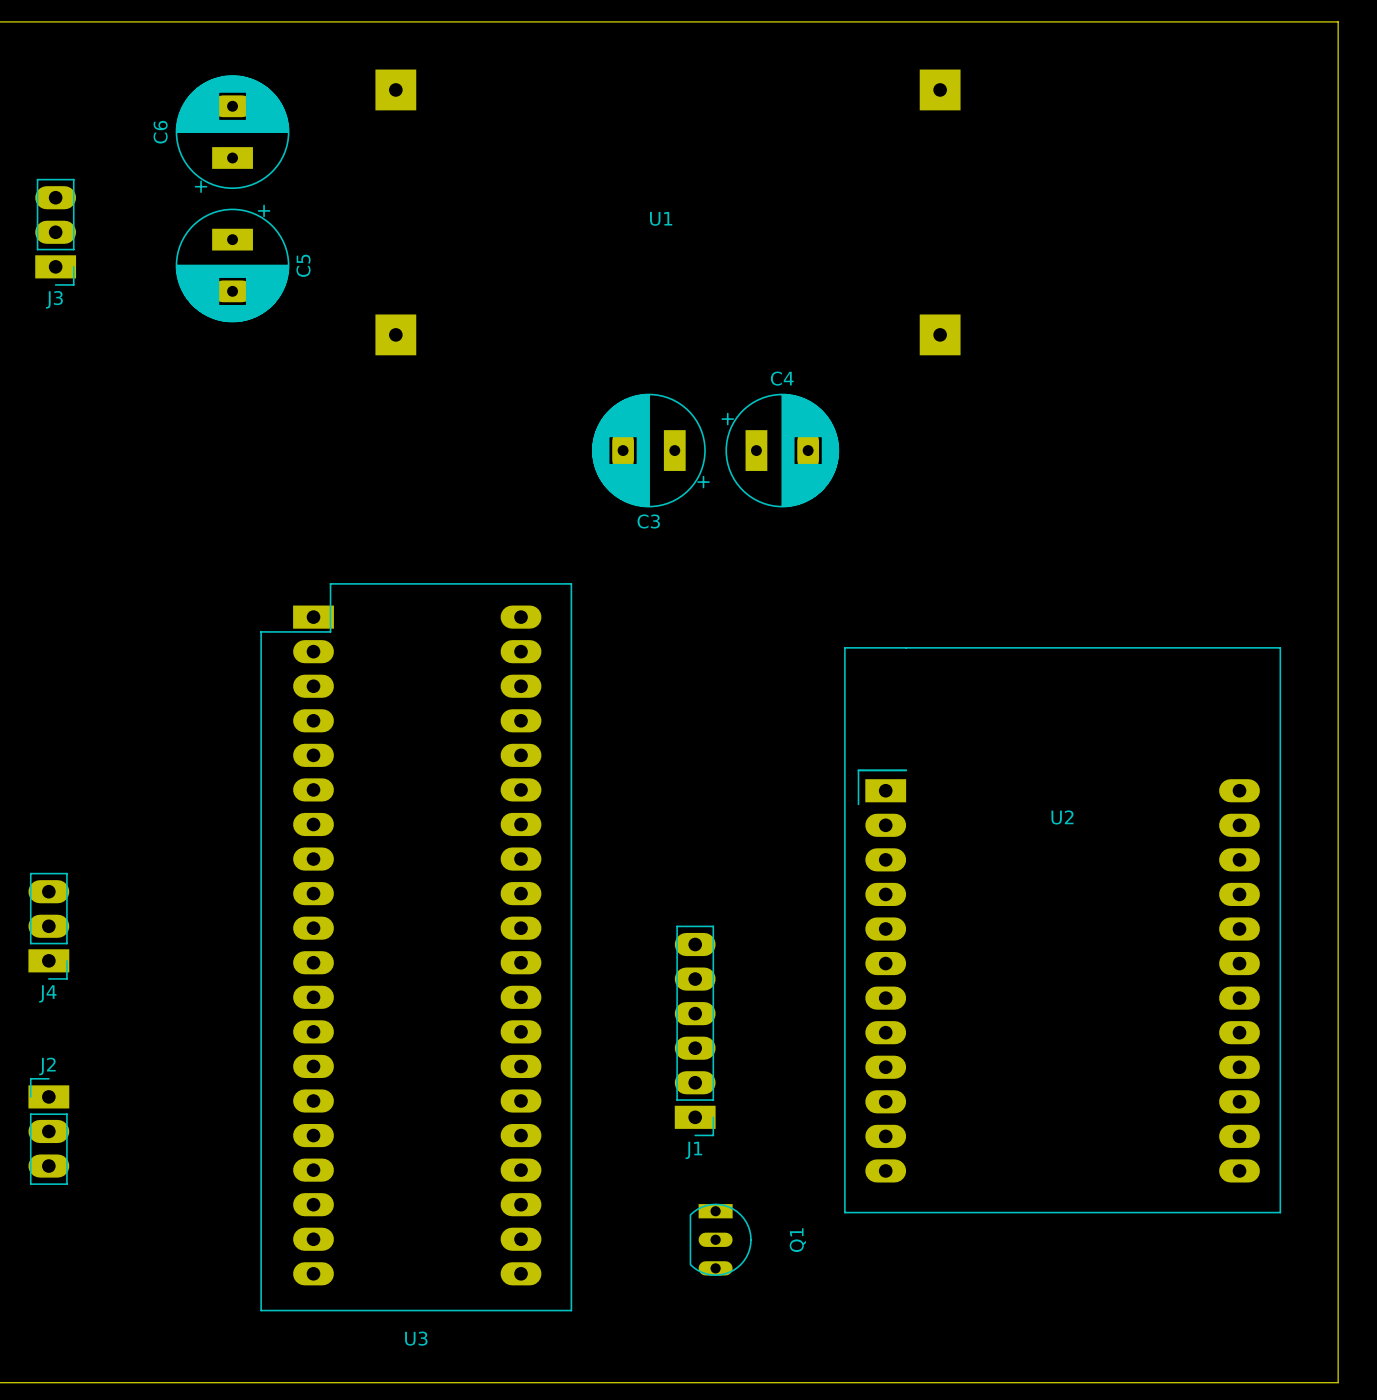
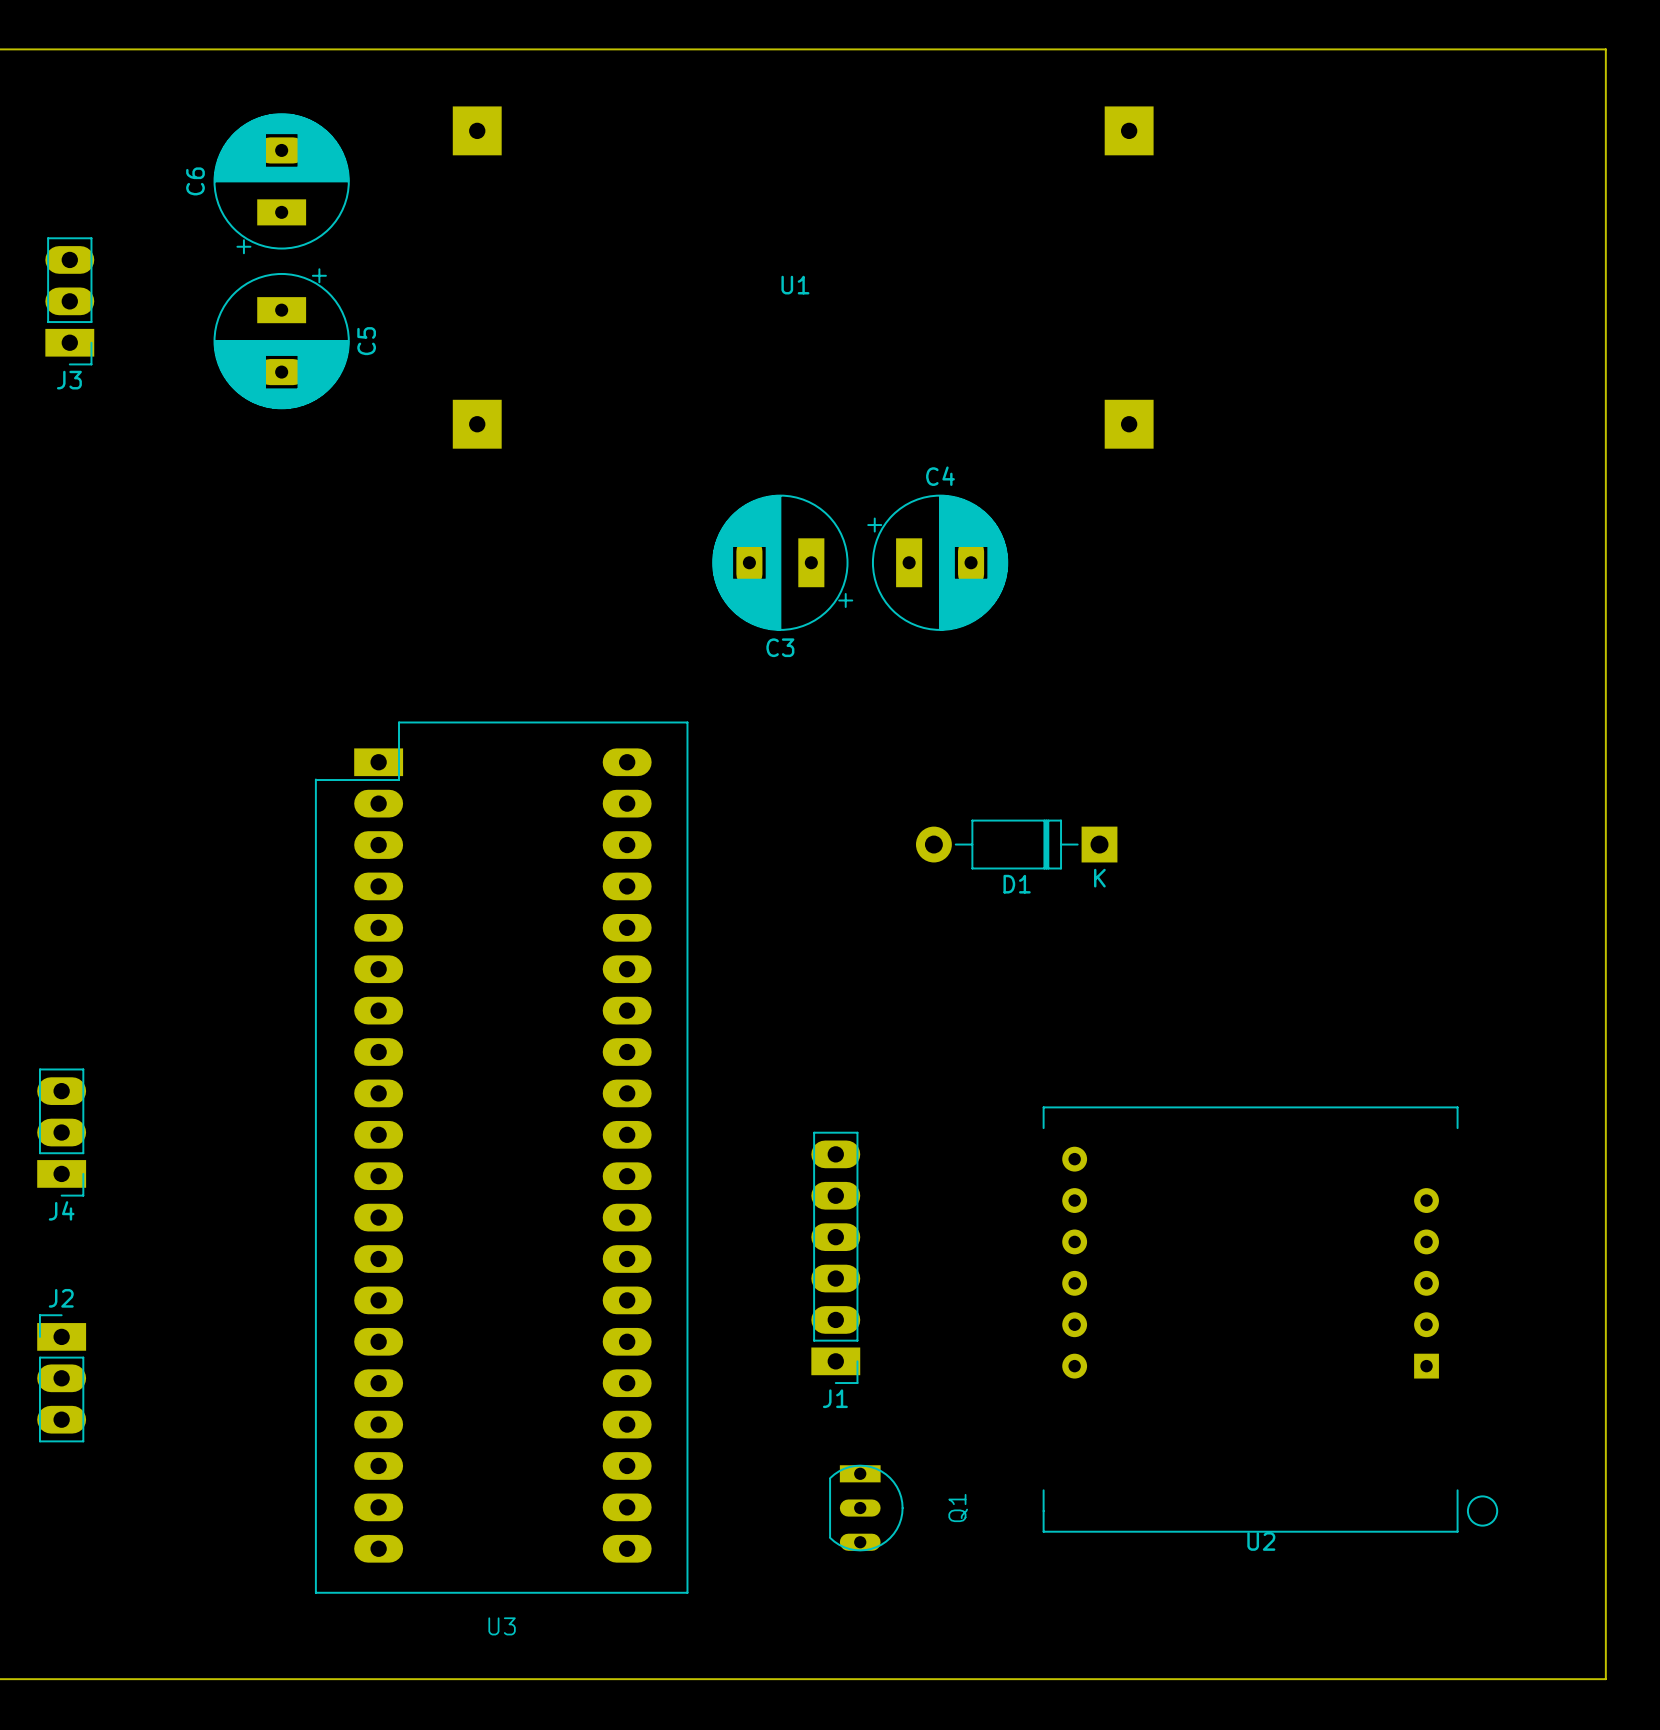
U2 footprint: [844, 647, 1282, 1214] -> [1042, 1106, 1499, 1533]
D1: none -> (1016, 844)
U2 name position: U2 (1062, 817) -> U2 (1261, 1541)

